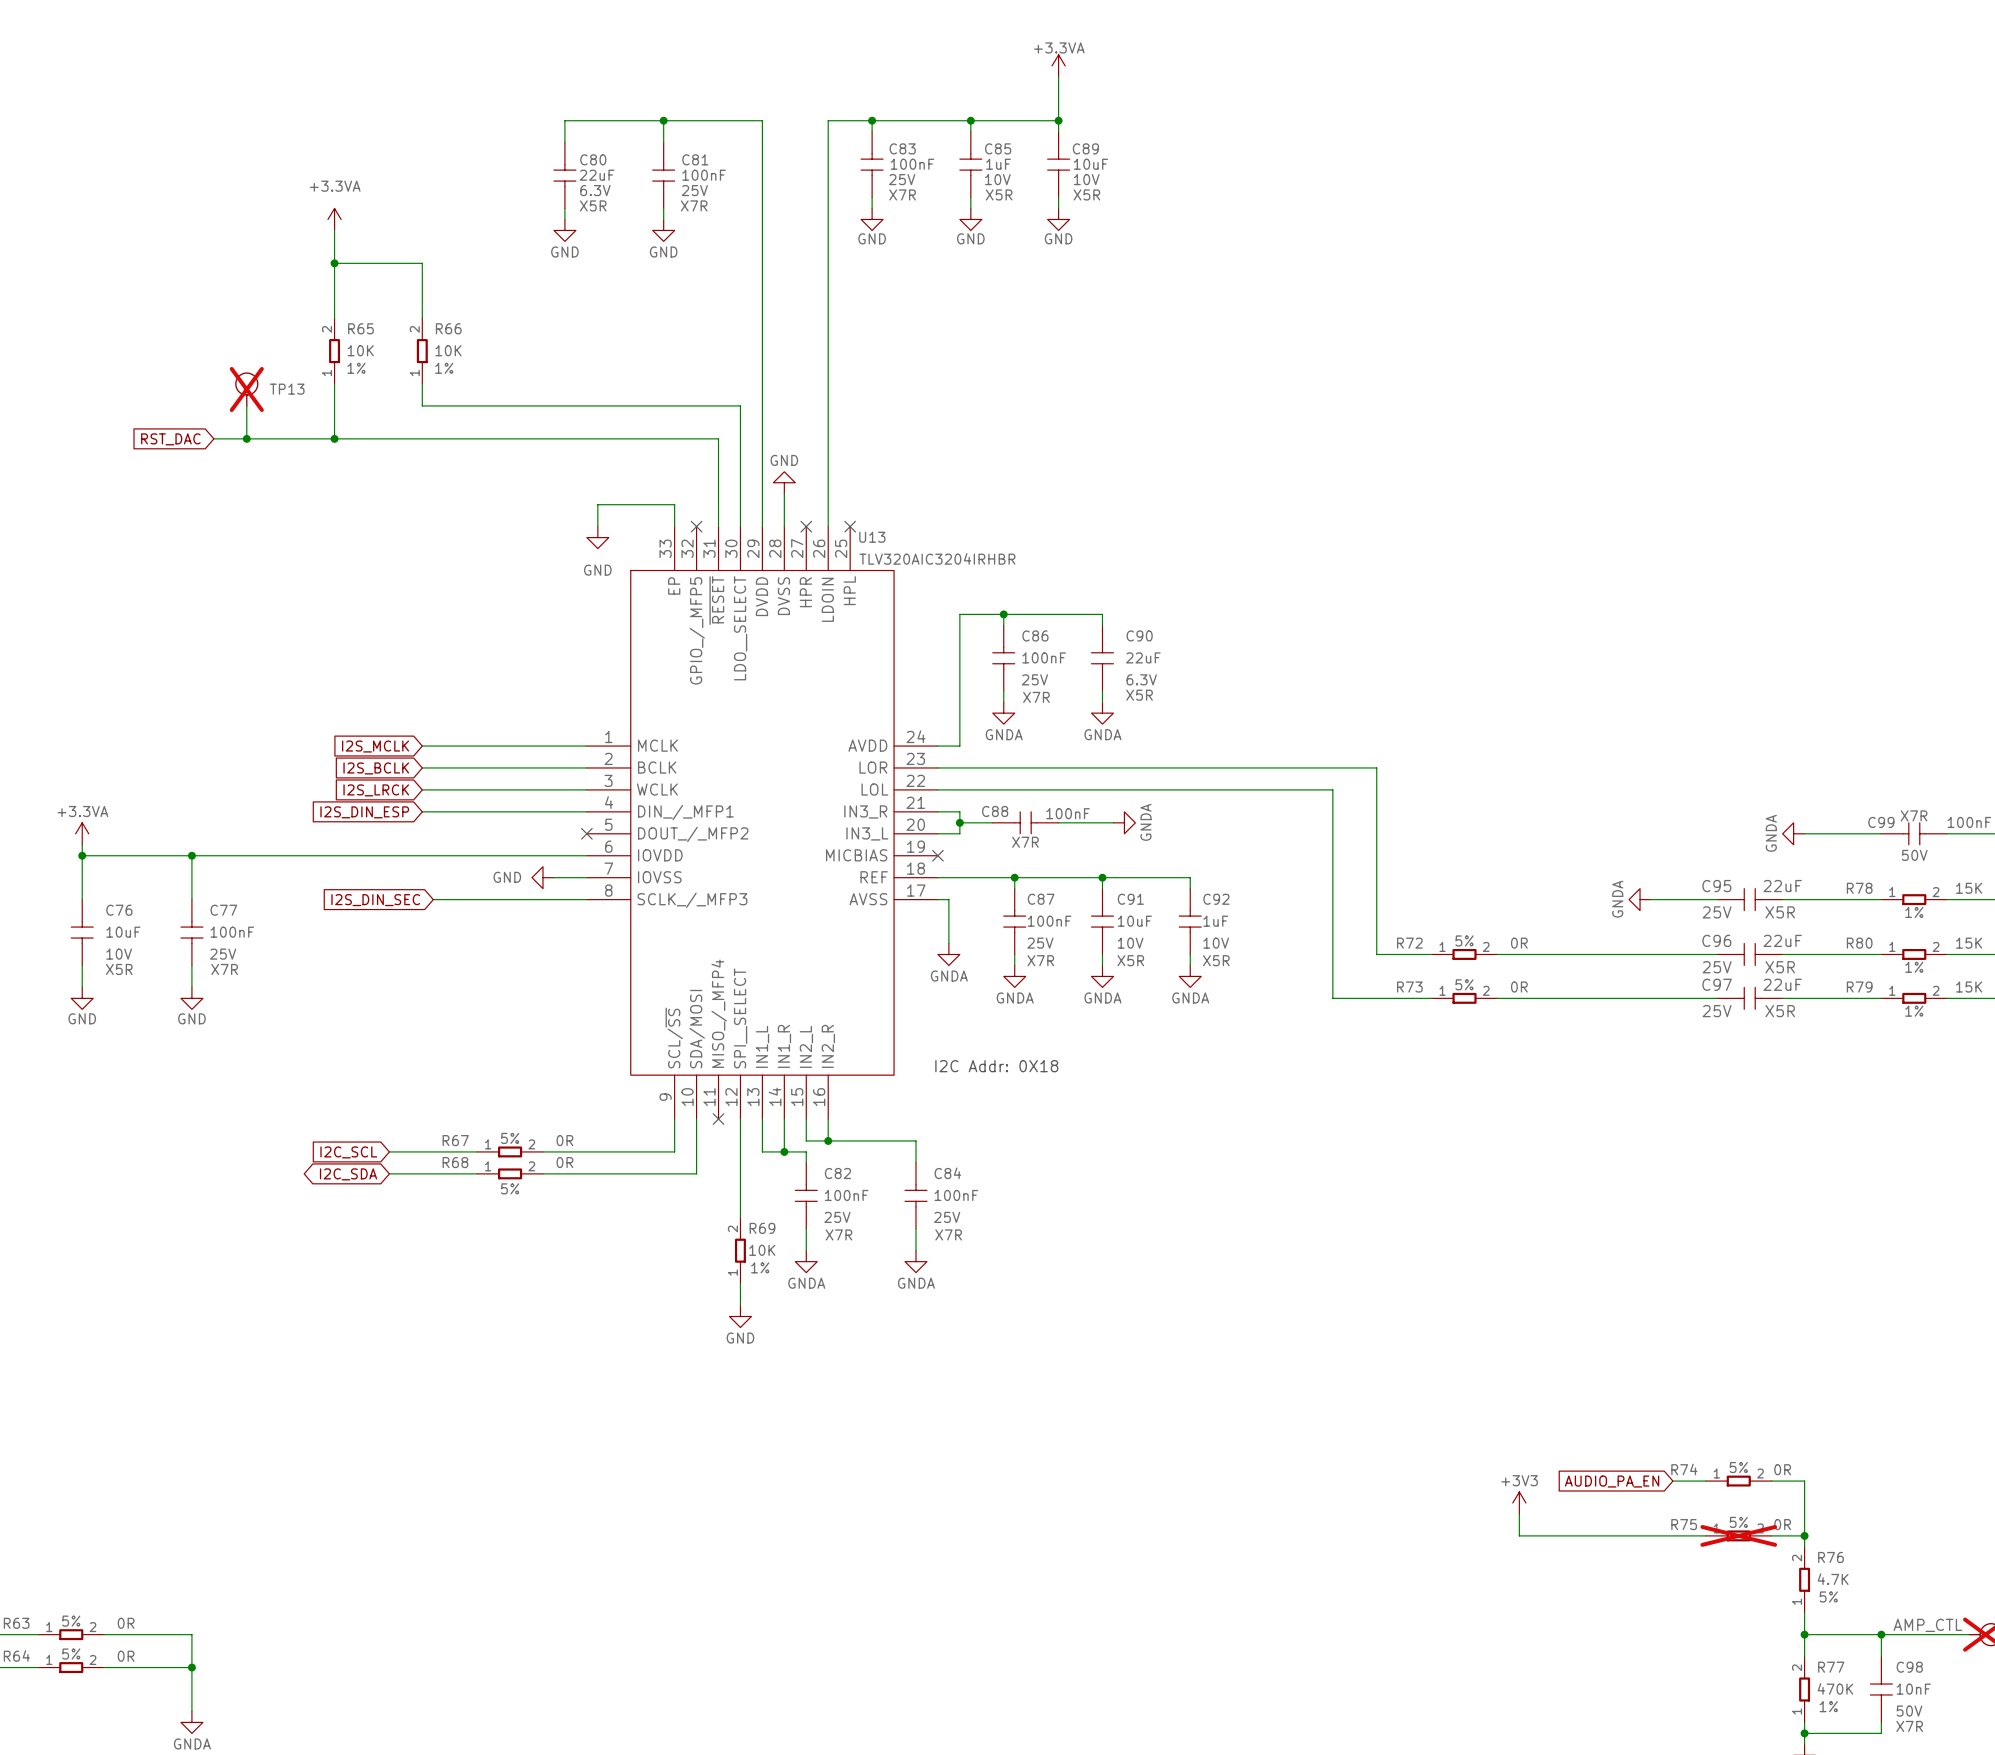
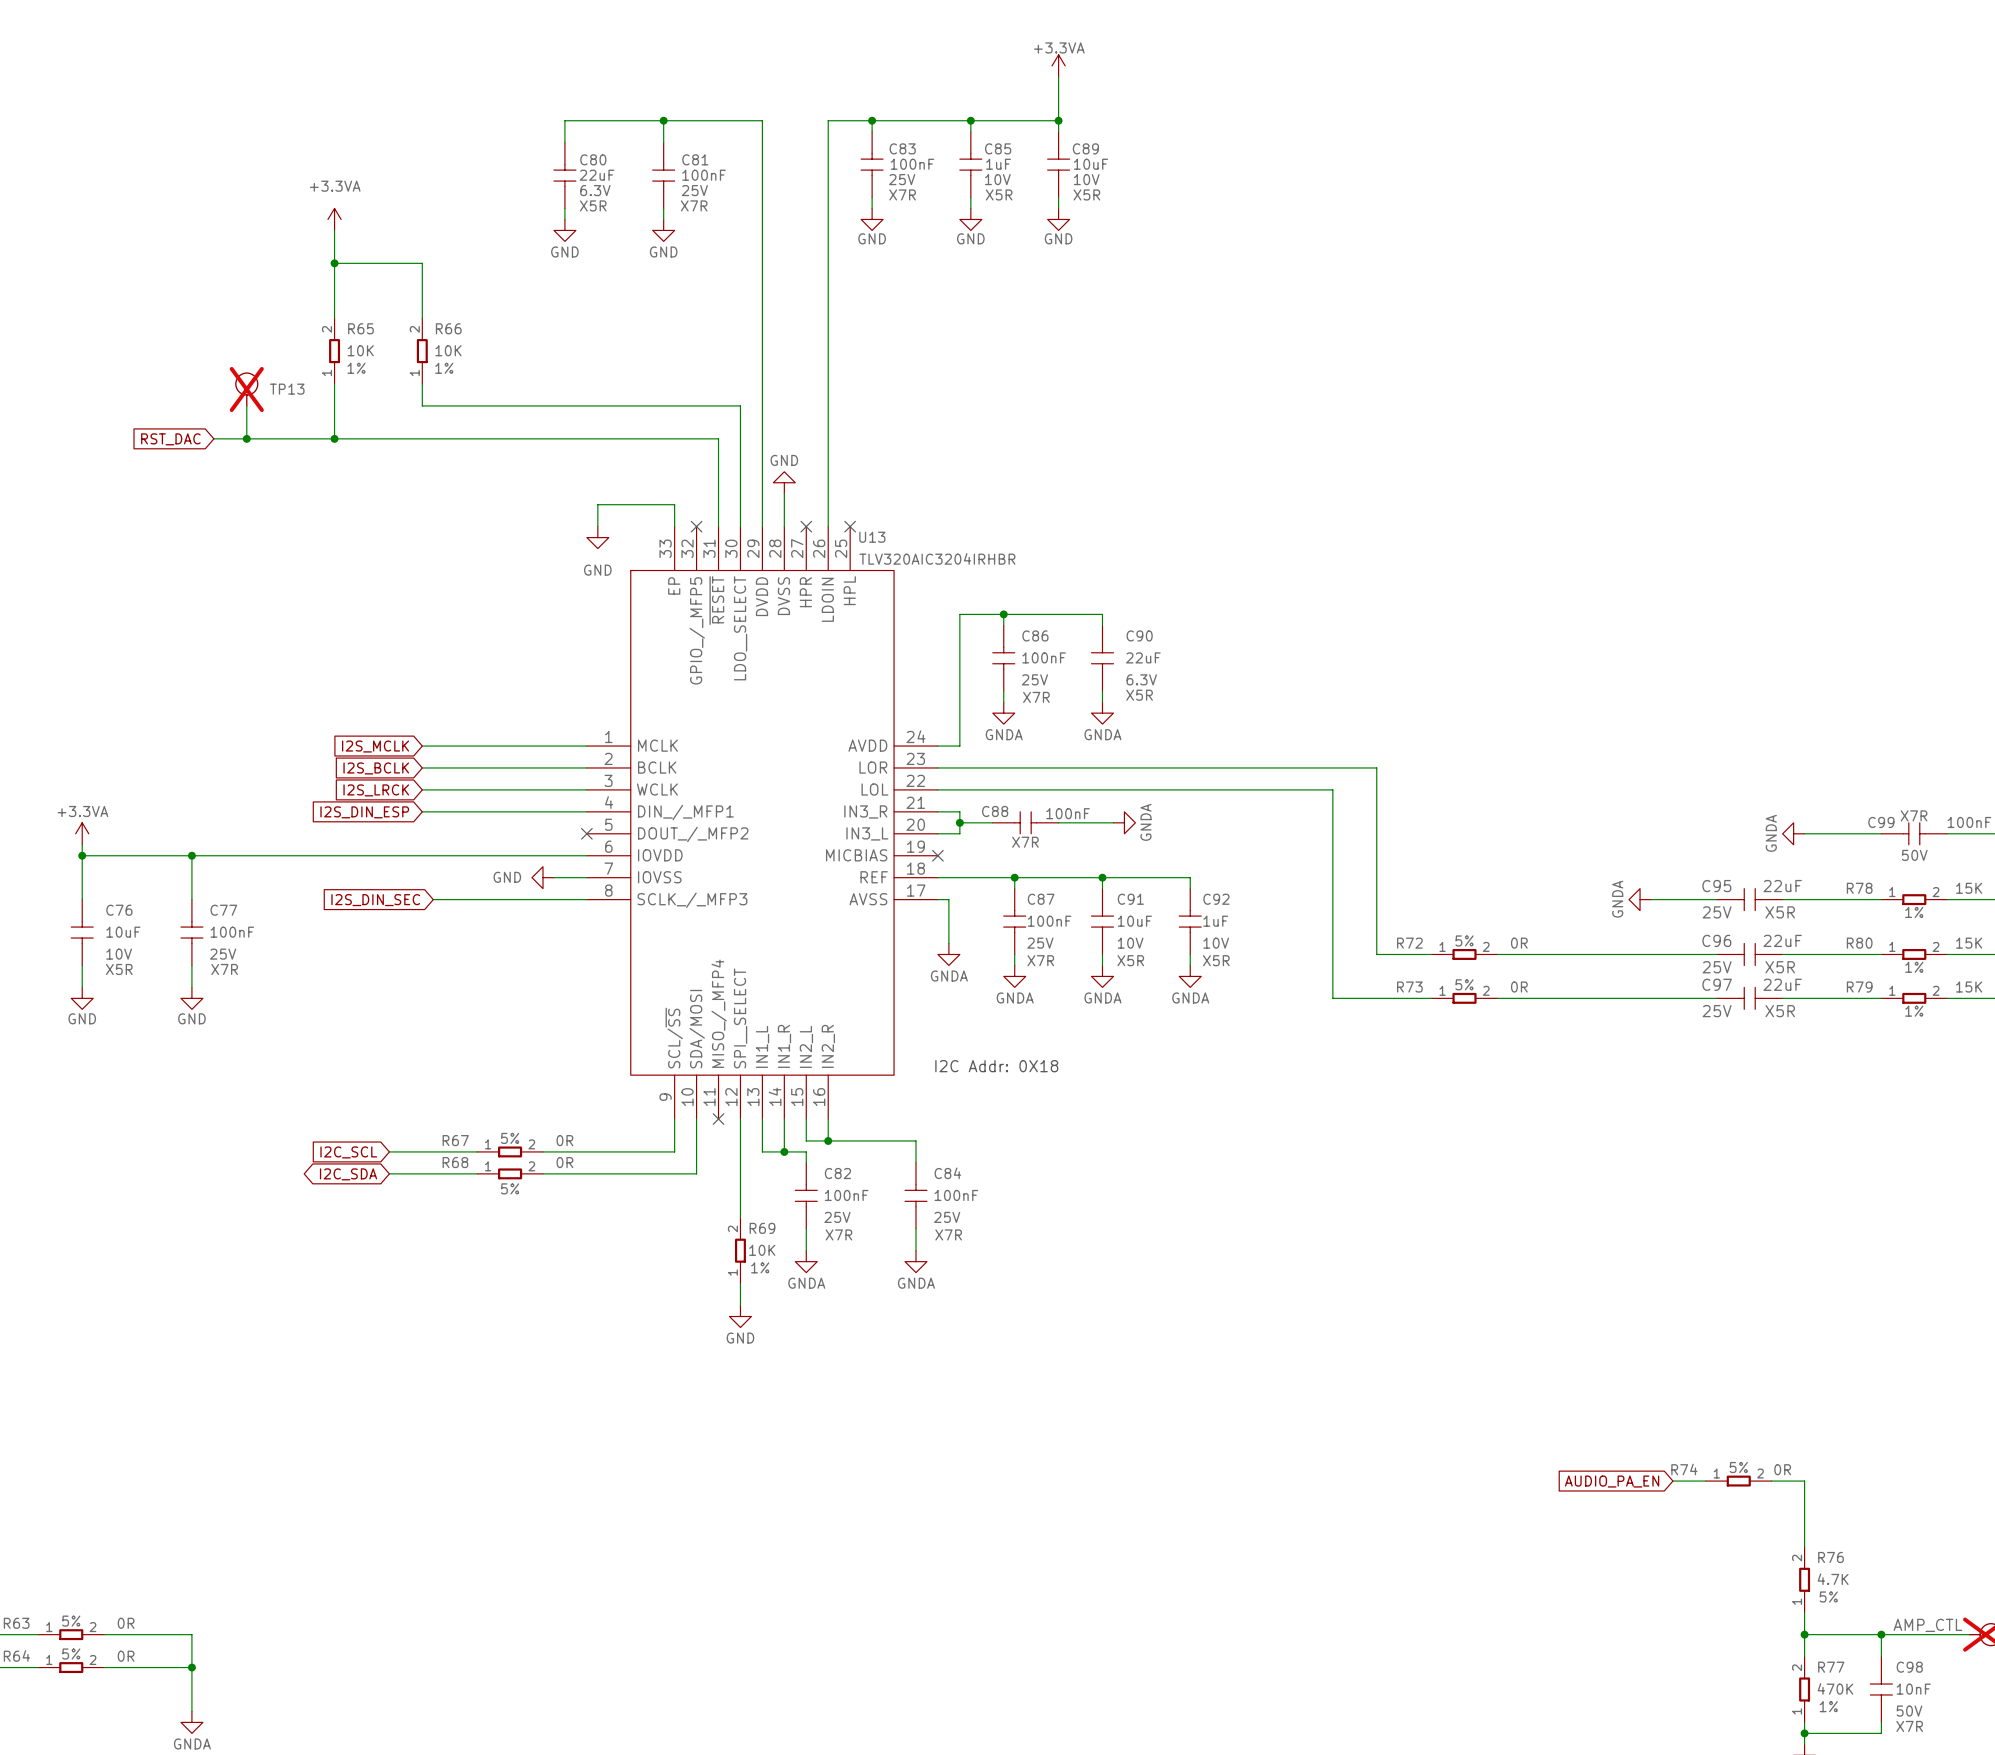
power symbol: +3V3 (1519, 1503) -> none
wire: (1519, 1513) (1519, 1535) (1705, 1535) -> none
R75: 0R (1738, 1535) -> none
wire: (1771, 1535) (1804, 1535) -> none
junction: (1804, 1535) -> none

